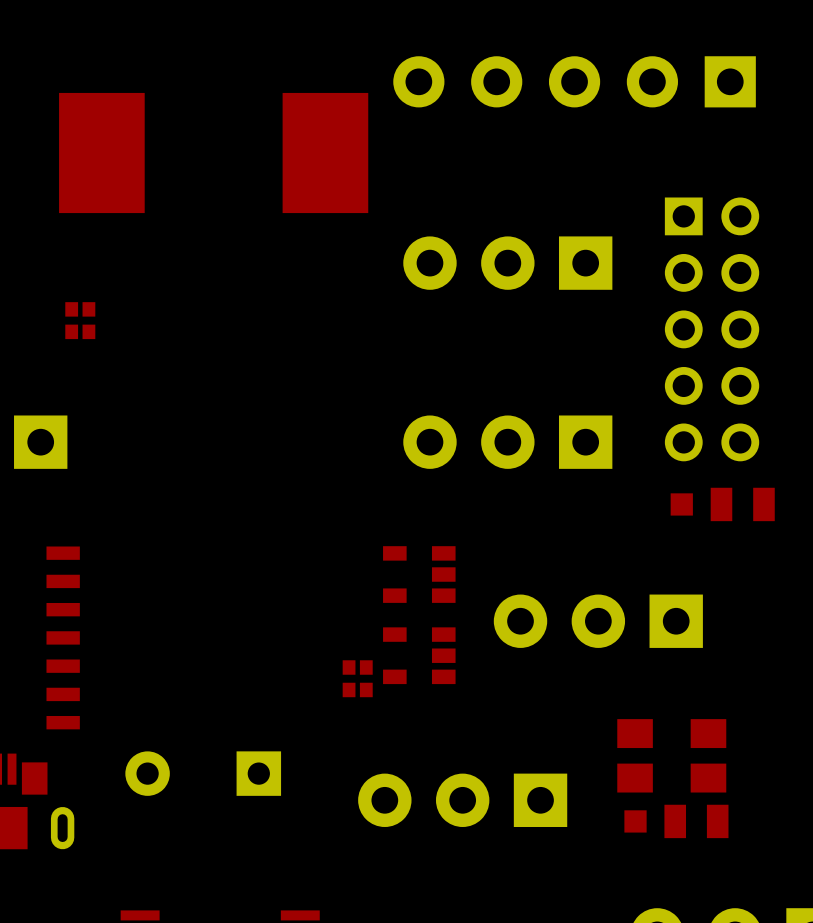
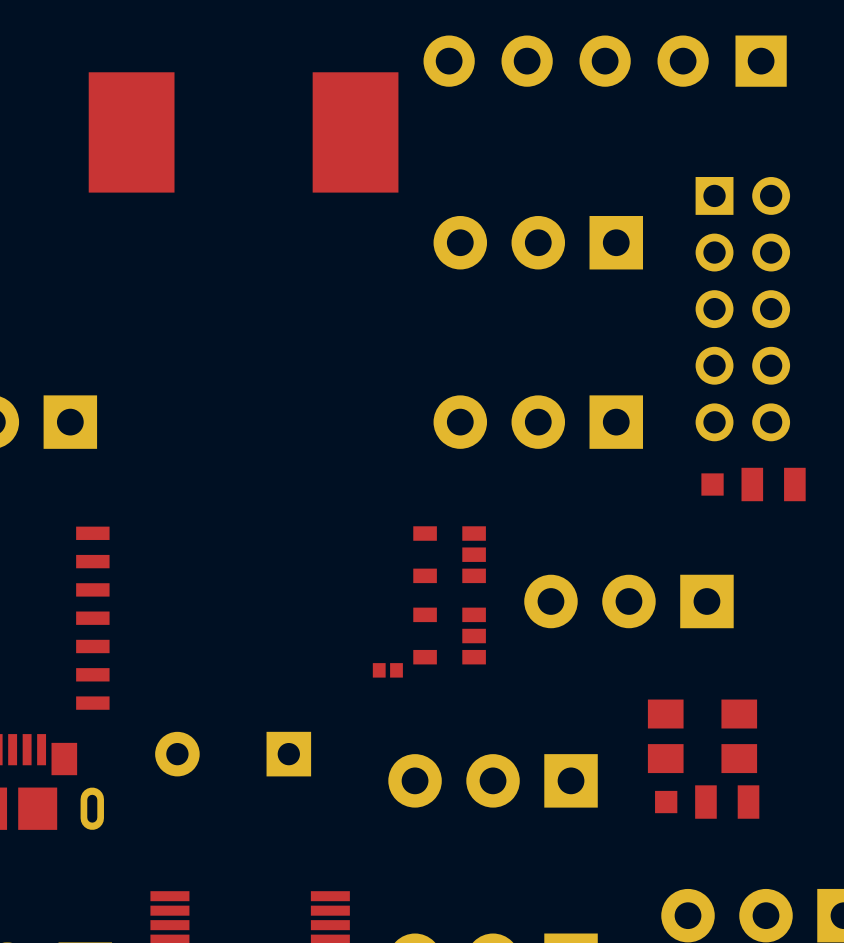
part: (80, 309) -> none
part: (80, 331) -> none
part: (357, 667) -> none

